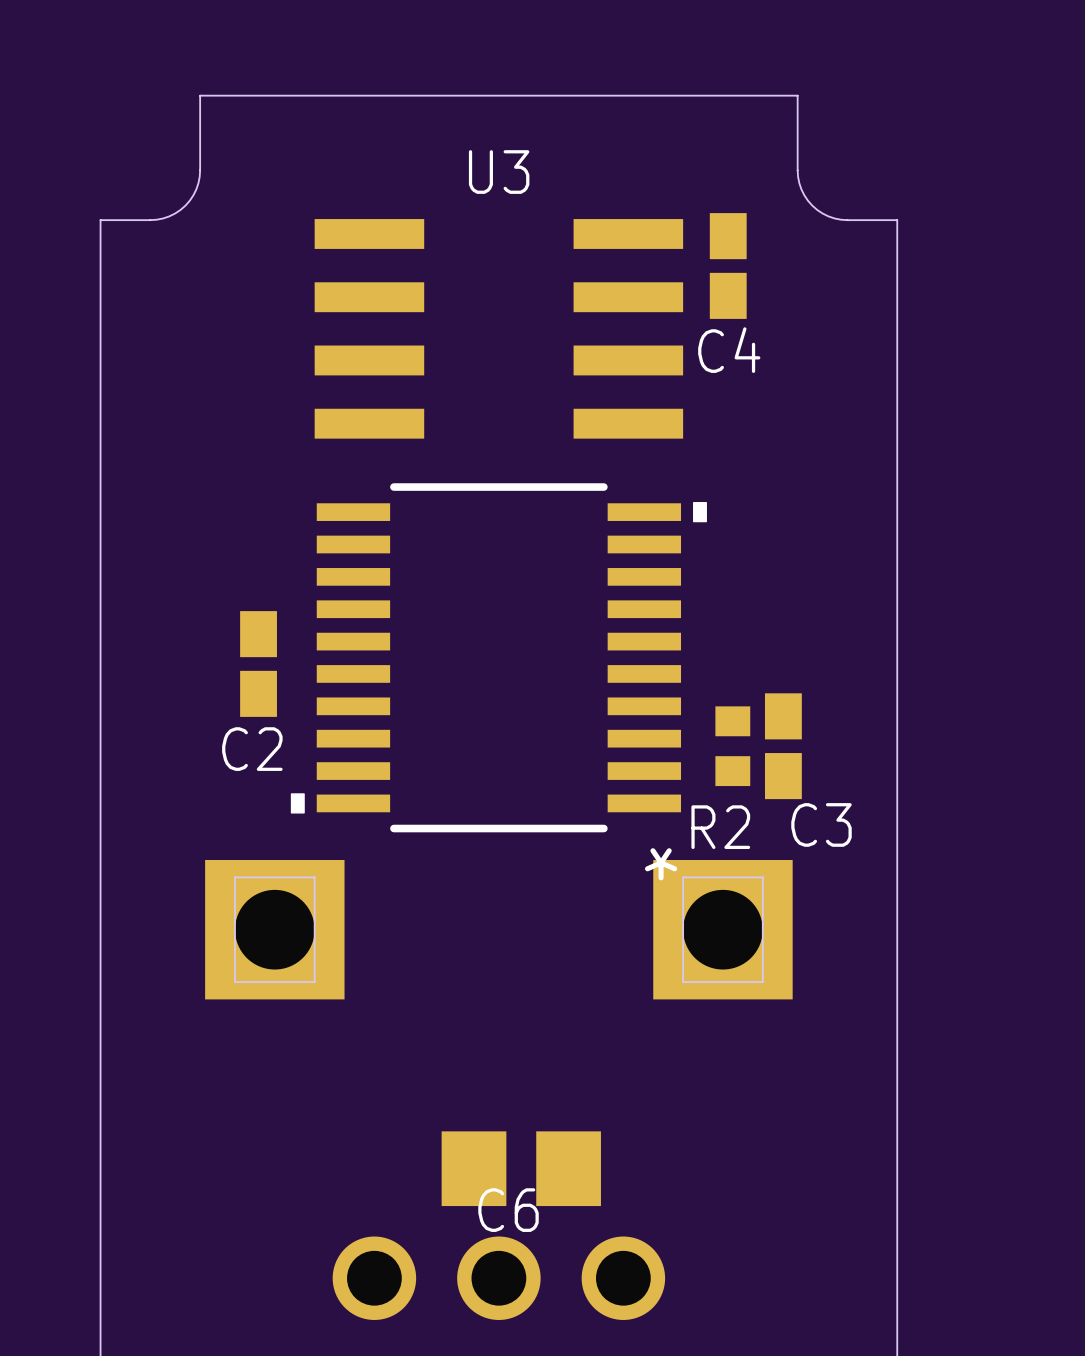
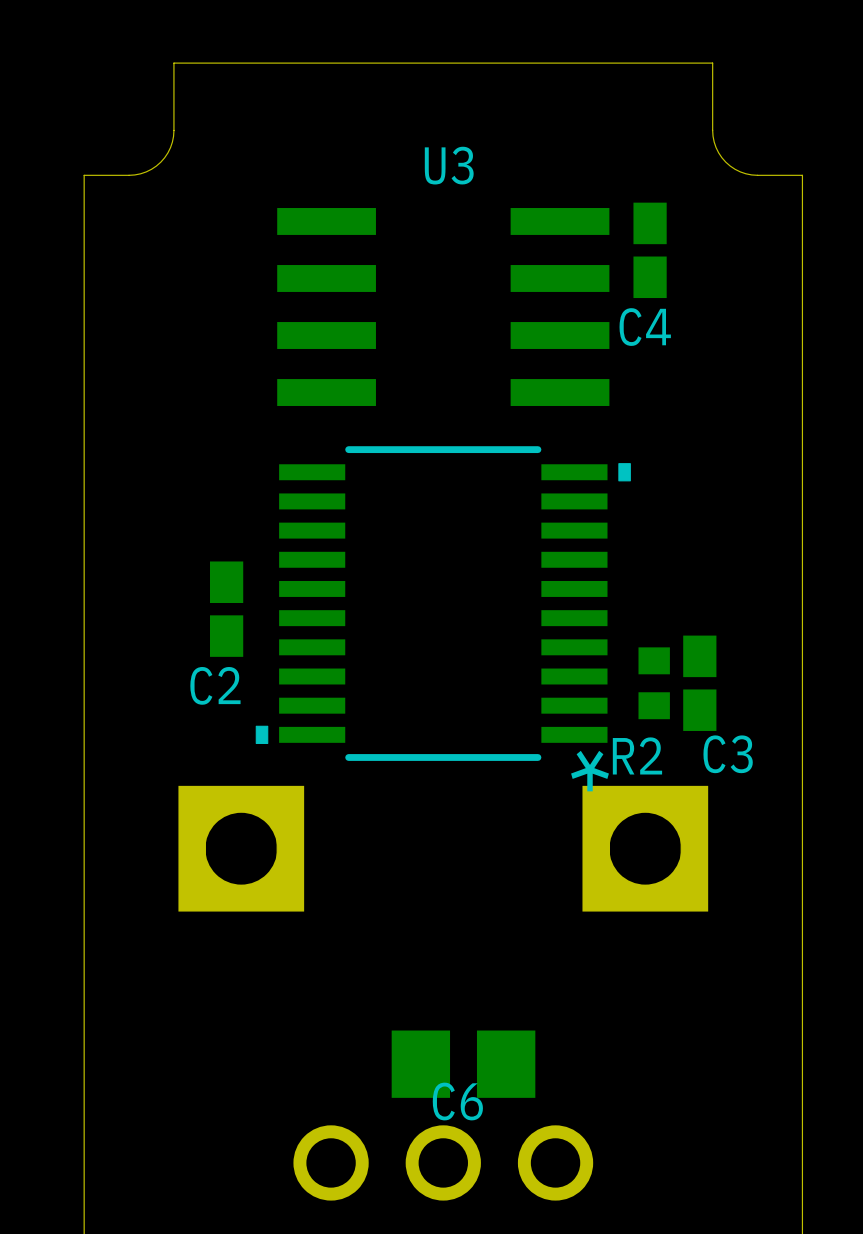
board edge: (797, 95) (200, 95) -> (712, 96) (712, 63) (173, 63) (173, 96)
board edge: (200, 133) (198, 183) (189, 200) (180, 209) (169, 216) (156, 219) (100, 220) -> (173, 130) (172, 142) (167, 152) (160, 162) (151, 169) (134, 174) (84, 175) (84, 208)
board edge: (797, 133) (799, 183) (807, 200) (817, 209) (828, 216) (840, 219) (897, 220) -> (712, 130) (714, 142) (718, 152) (725, 162) (735, 169) (751, 174) (802, 175) (802, 208)

